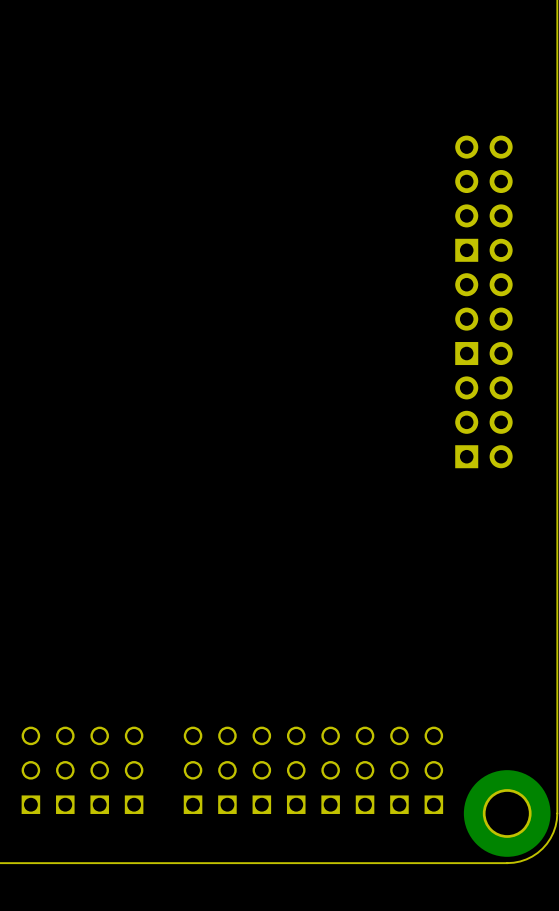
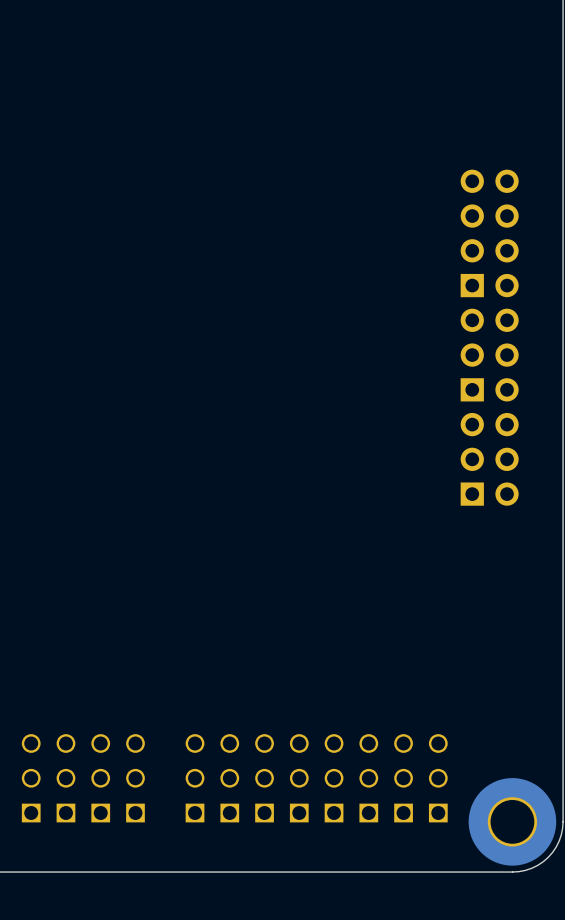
part position: (483, 198) -> (489, 233)
part position: (483, 319) -> (489, 355)
part position: (483, 422) -> (489, 459)

